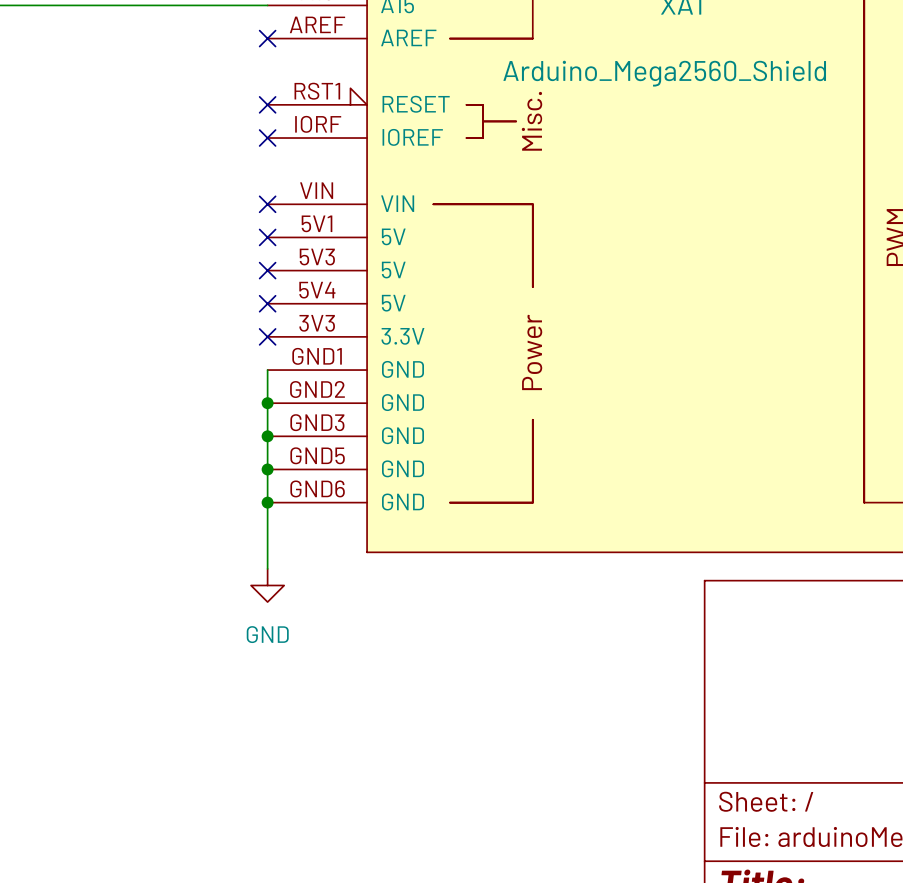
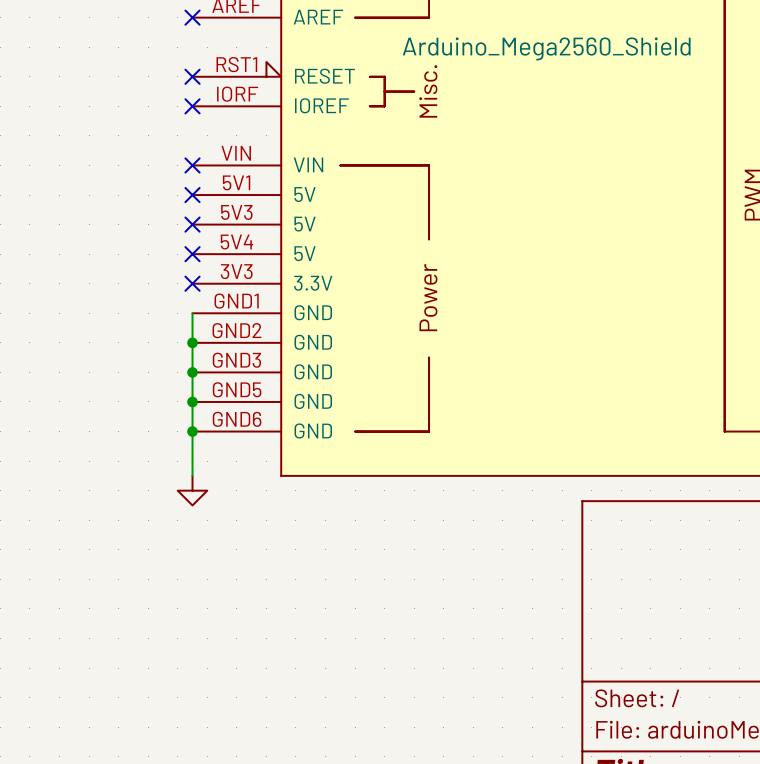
power symbol: none -> (192, 490)
power symbol: GND (267, 585) -> none

